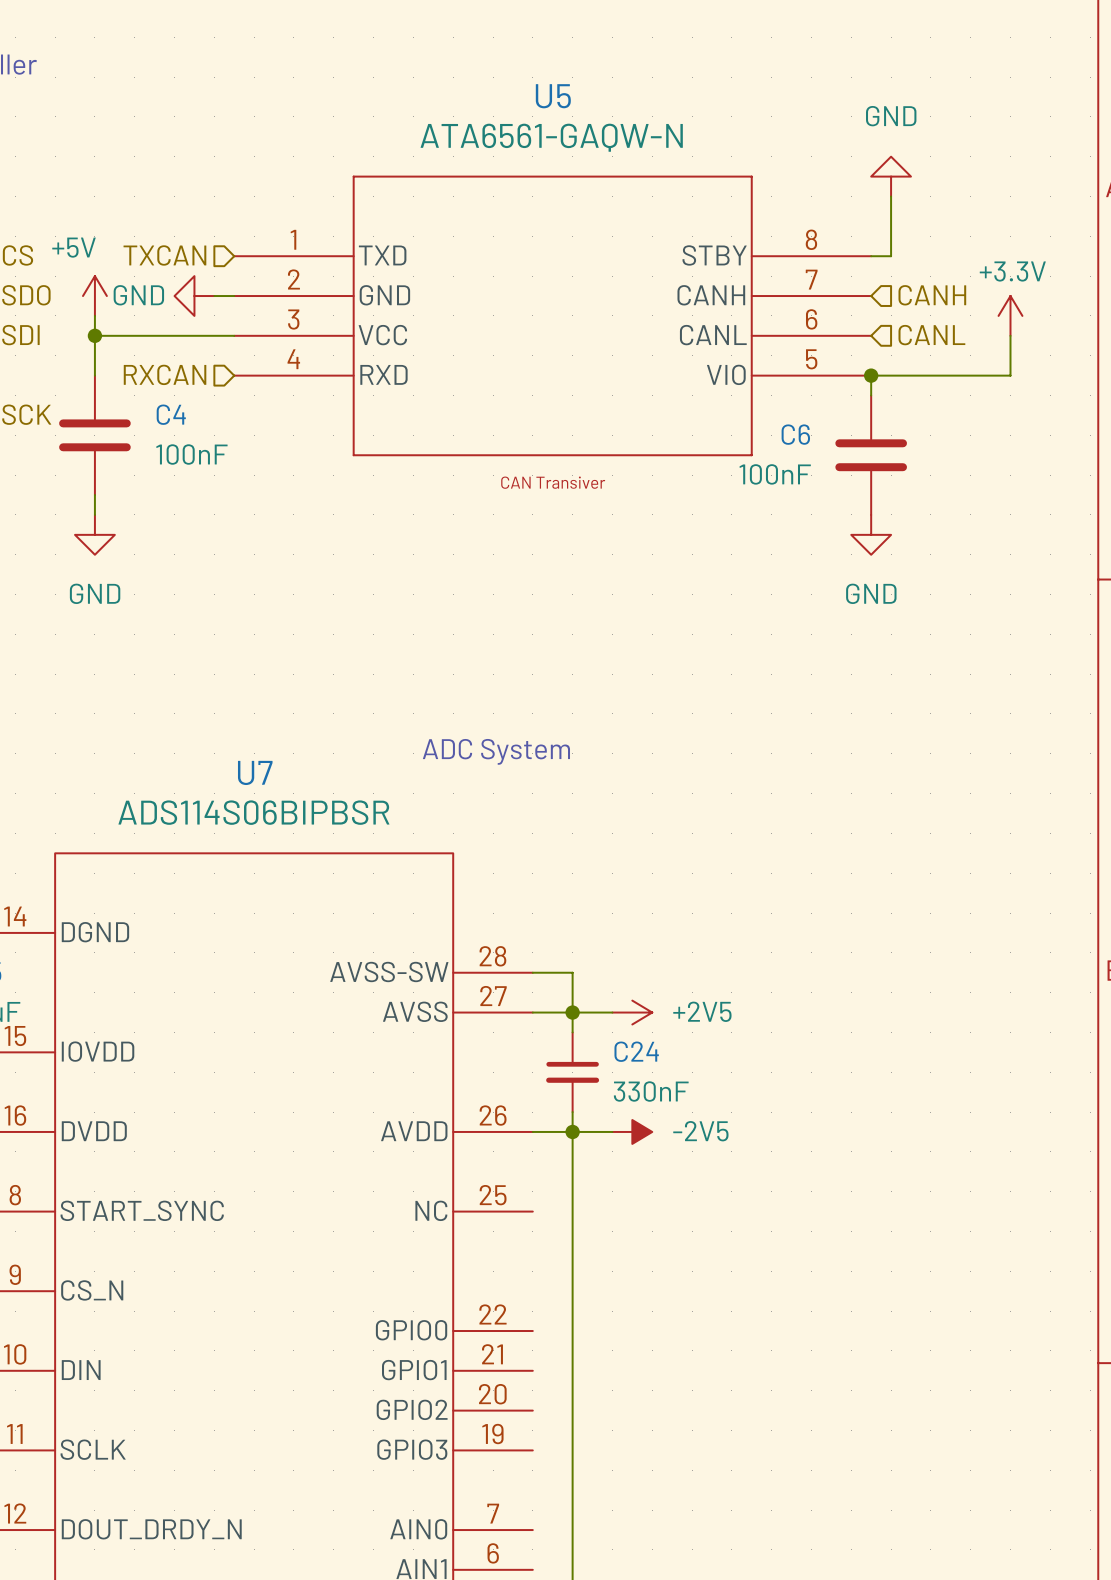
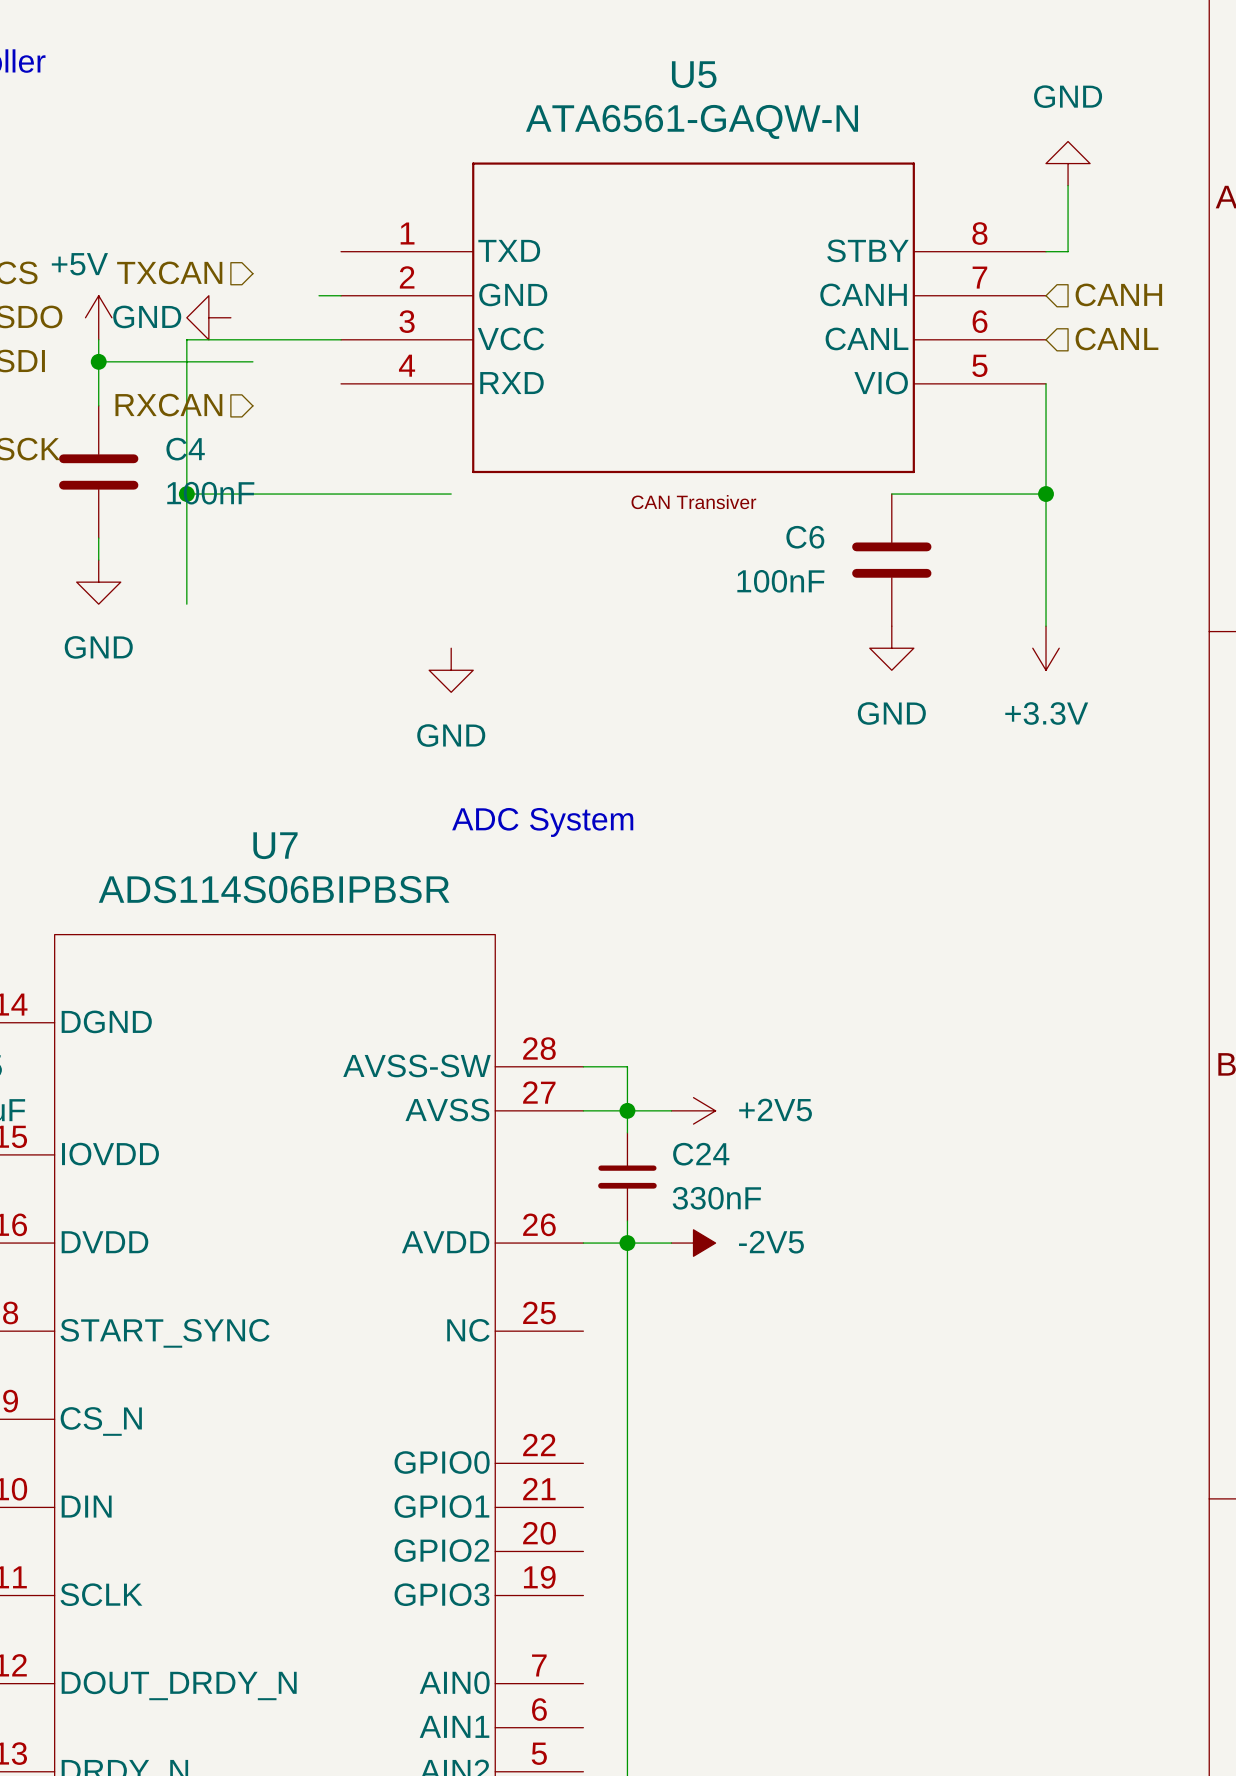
power symbol position: GND (891, 176) -> GND (1068, 163)
wire: (891, 196) (891, 256) (871, 256) -> (1068, 185) (1068, 251) (1046, 251)
hierarchical label position: CANH (932, 295) -> CANH (1118, 294)
wire: (214, 296) (234, 296) -> (319, 295) (341, 295)
wire: none -> (341, 339) (186, 339) (186, 604)
U5 position: (552, 315) -> (693, 317)
power symbol rotation: 0° (1010, 315) -> 180° (1046, 648)
power symbol position: +3.3V (1010, 315) -> +3.3V (1046, 648)
hierarchical label position: CANL (931, 335) -> CANL (1116, 338)
wire: (1010, 335) (1010, 375) (871, 375) (871, 395) -> none
wire: none -> (1046, 383) (1046, 626)
junction: (871, 375) -> none
wire: none -> (186, 494) (451, 494)
junction: none -> (186, 494)
wire: none -> (891, 494) (1046, 494)
C6 position: (871, 455) -> (891, 560)
junction: none -> (1046, 494)
power symbol position: GND (871, 534) -> GND (891, 648)
power symbol: none -> GND (451, 670)

